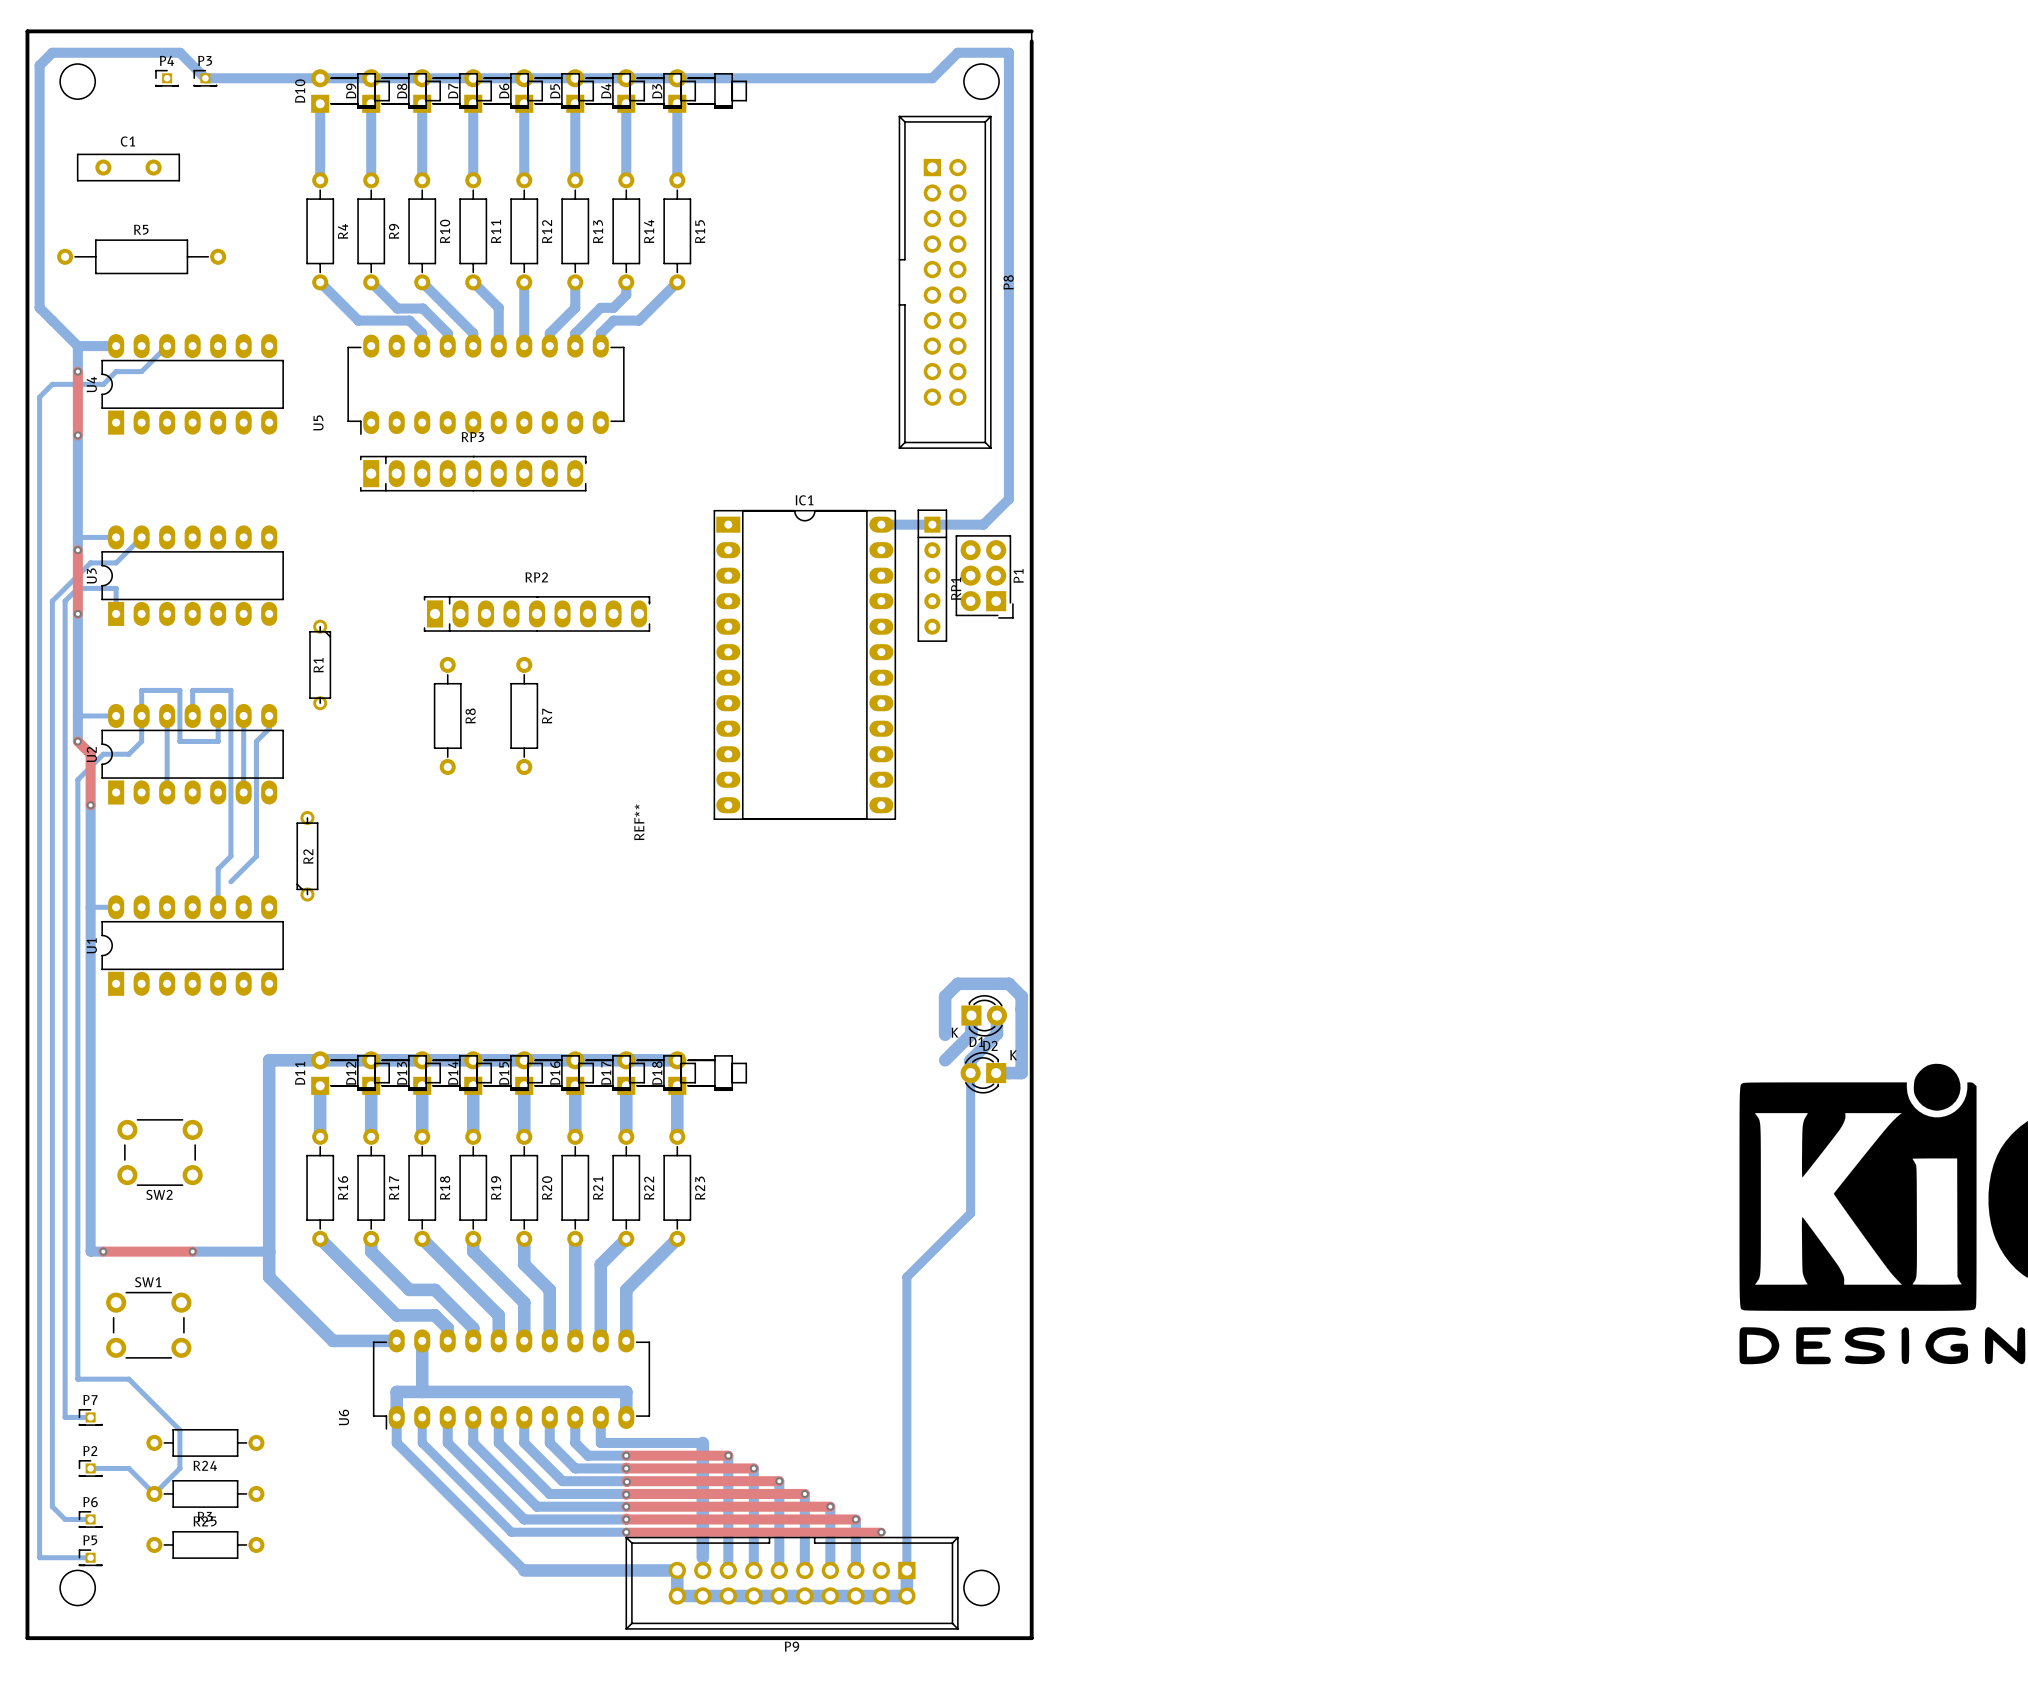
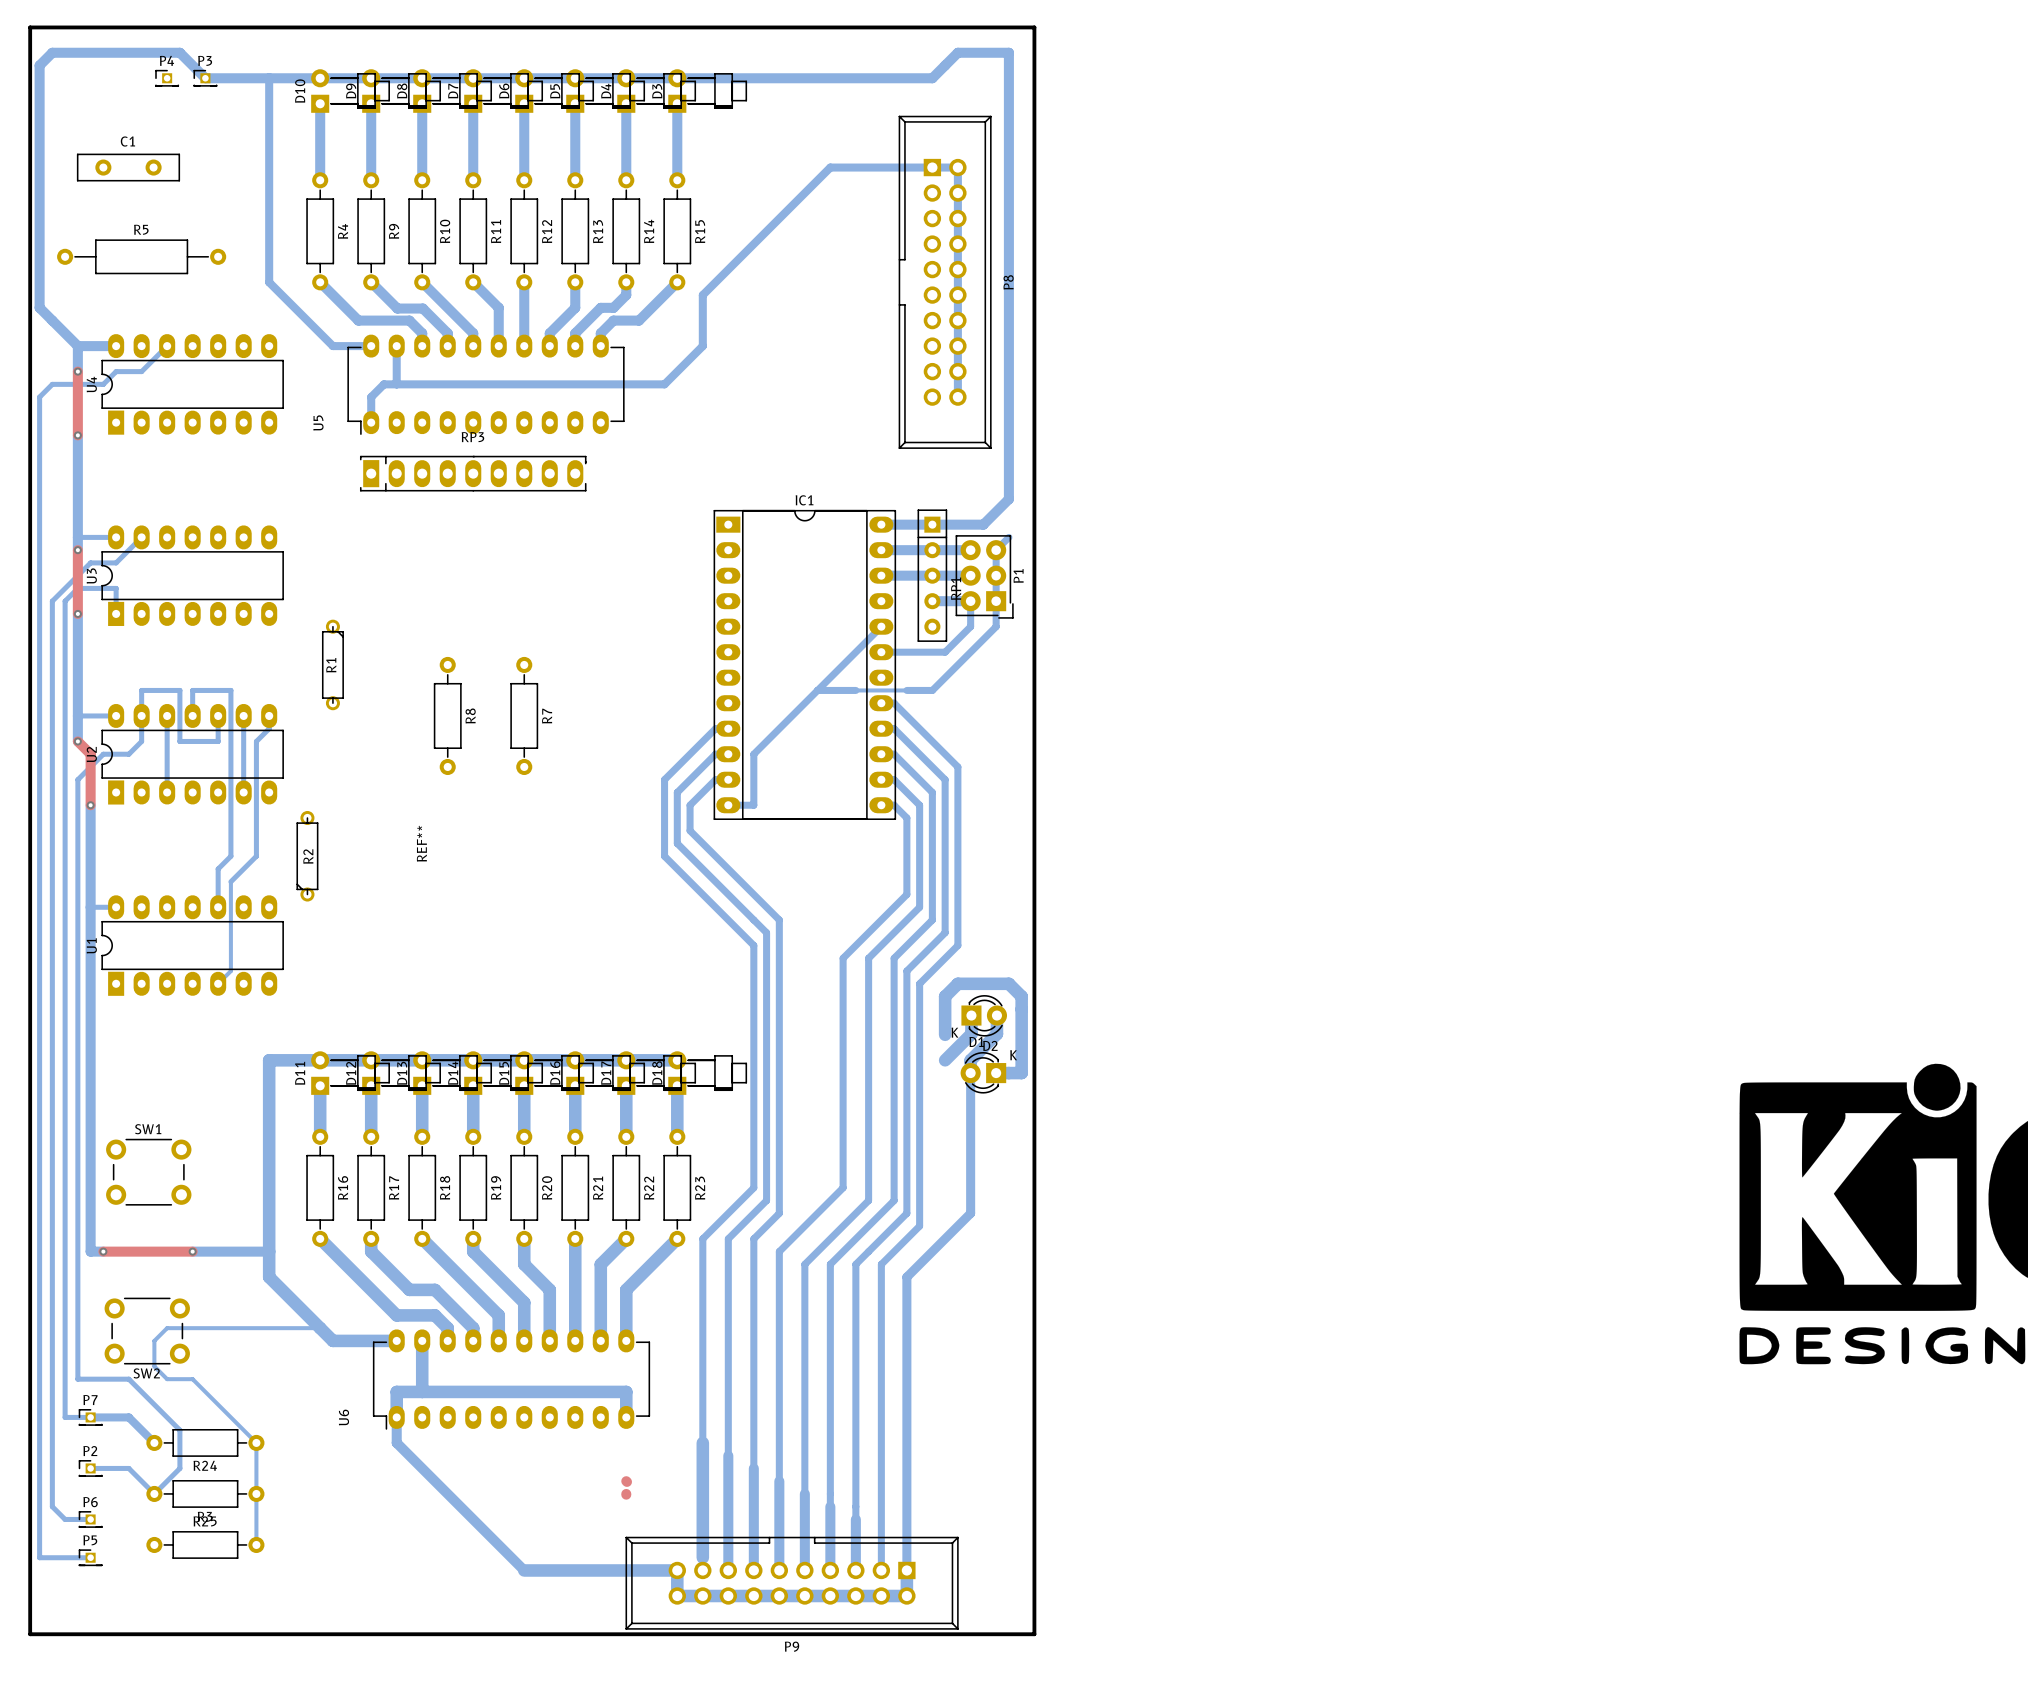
REF** footprint: [25, 29, 1034, 1641] -> [28, 25, 1037, 1637]
bottom track: none -> (269, 78) (269, 282) (332, 346) (371, 346)
bottom track: none -> (396, 346) (396, 384)
bottom track: none -> (957, 397) (957, 167) (830, 167) (702, 295) (702, 346) (664, 384) (383, 384) (371, 397) (371, 422)
bottom track: none -> (1008, 537) (996, 550) (996, 626) (932, 690) (817, 690)
bottom track: none -> (881, 550) (970, 550)
bottom track: none -> (881, 575) (970, 575)
bottom track: none -> (932, 601) (970, 601) (970, 626) (945, 652) (881, 652)
RP2: (537, 613) -> none
bottom track: none -> (881, 626) (753, 754) (753, 805) (728, 805)
R1 position: (320, 664) -> (332, 664)
bottom track: none -> (881, 703) (894, 703) (957, 766) (957, 945) (919, 983) (919, 1226) (881, 1264) (881, 1570)
bottom track: none -> (881, 728) (894, 728) (945, 779) (945, 932) (906, 971) (906, 1213) (855, 1264) (855, 1519)
bottom track: none -> (728, 754) (715, 754) (677, 792) (677, 843) (766, 932) (766, 1200) (728, 1238) (728, 1455)
bottom track: none -> (881, 754) (894, 754) (932, 792) (932, 920) (894, 958) (894, 1200) (830, 1264) (830, 1506)
bottom track: none -> (728, 779) (715, 779) (690, 805) (690, 830) (779, 920) (779, 1213) (753, 1238) (753, 1468)
bottom track: none -> (881, 779) (894, 779) (919, 805) (919, 907) (868, 958) (868, 1200) (804, 1264) (804, 1493)
bottom track: none -> (881, 805) (894, 805) (906, 817) (906, 894) (843, 958) (843, 1187) (779, 1251) (779, 1481)
REF** name position: REF** (639, 822) -> REF** (421, 843)
bottom track: none -> (230, 881) (230, 971) (218, 983)
SW2 position: (160, 1152) -> (147, 1331)
SW1 position: (148, 1325) -> (148, 1172)
bottom track: none -> (320, 1328) (167, 1328) (154, 1340) (154, 1366) (167, 1379) (192, 1379) (256, 1442) (256, 1544)
bottom track: none -> (90, 1417) (128, 1417) (154, 1442)
bottom track: (422, 1417) (422, 1442) (511, 1532) (626, 1532) -> none
bottom track: (447, 1417) (447, 1442) (524, 1519) (626, 1519) -> none
bottom track: (473, 1417) (473, 1442) (537, 1506) (626, 1506) -> none
bottom track: (498, 1417) (498, 1442) (549, 1493) (626, 1493) -> none
bottom track: (524, 1417) (524, 1442) (562, 1481) (626, 1481) -> none
bottom track: (549, 1417) (549, 1442) (575, 1468) (626, 1468) -> none
bottom track: (575, 1417) (575, 1442) (588, 1455) (626, 1455) -> none
bottom track: (600, 1417) (600, 1442) (702, 1442) -> (728, 728) (715, 728) (664, 779) (664, 856) (753, 945) (753, 1187) (702, 1238) (702, 1442)
top track: (626, 1455) (728, 1455) -> none
via: (626, 1455) -> none
via: (728, 1455) -> none
top track: (626, 1467) (753, 1468) -> none
via: (626, 1468) -> none
via: (753, 1468) -> none
via: (626, 1481) -> none
top track: (627, 1481) (779, 1481) -> none
via: (779, 1481) -> none
top track: (626, 1493) (804, 1493) -> none
via: (804, 1493) -> none
via: (626, 1494) -> none
top track: (626, 1506) (830, 1506) -> none
via: (626, 1506) -> none
via: (830, 1506) -> none
top track: (626, 1518) (855, 1519) -> none
via: (626, 1519) -> none
via: (855, 1519) -> none
top track: (626, 1532) (881, 1532) -> none
via: (626, 1532) -> none
via: (881, 1532) -> none

